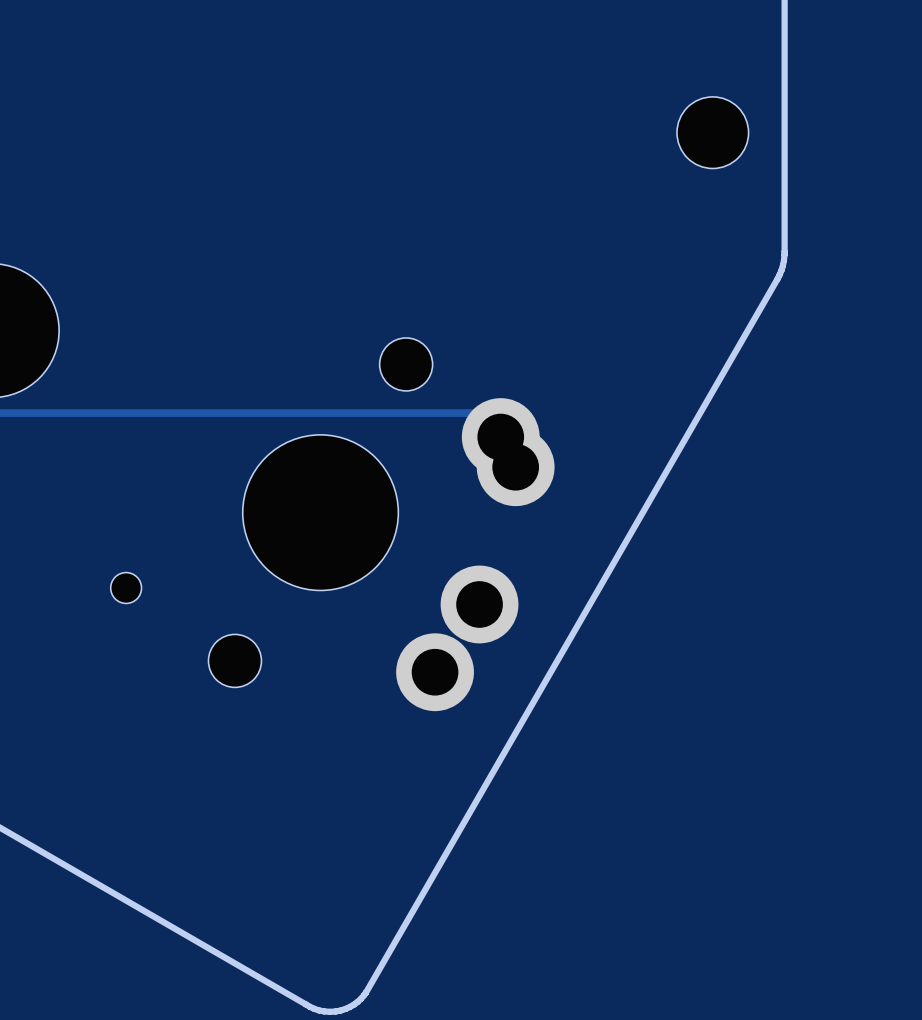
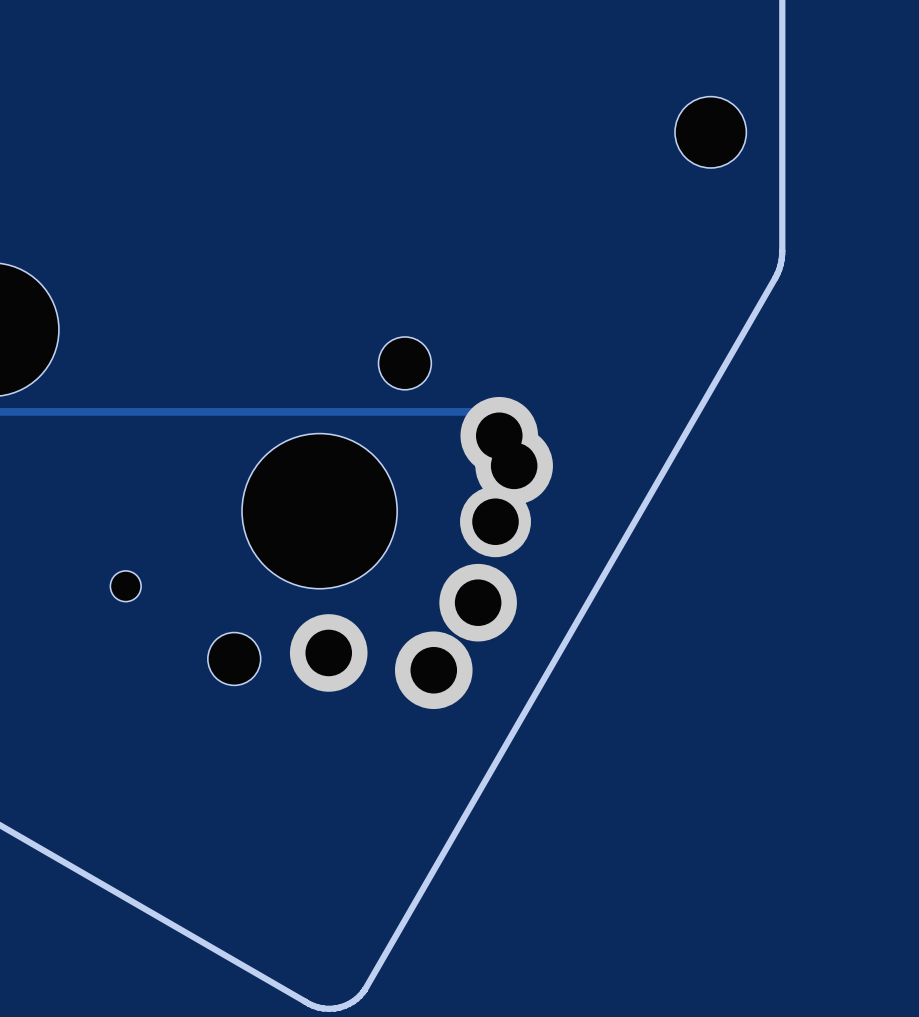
part footprint: [110, 337, 555, 712] -> [110, 336, 553, 710]

